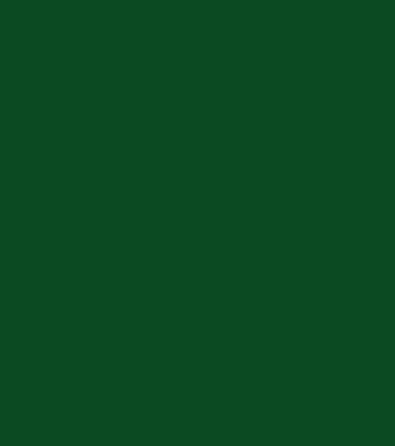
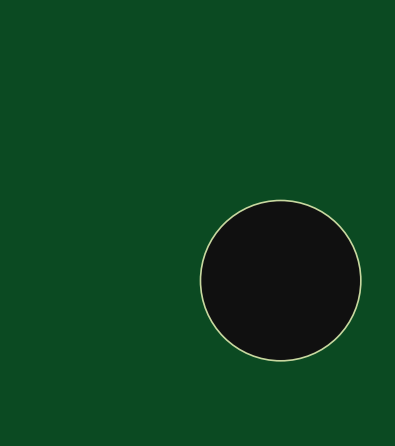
part: none -> (280, 280)

